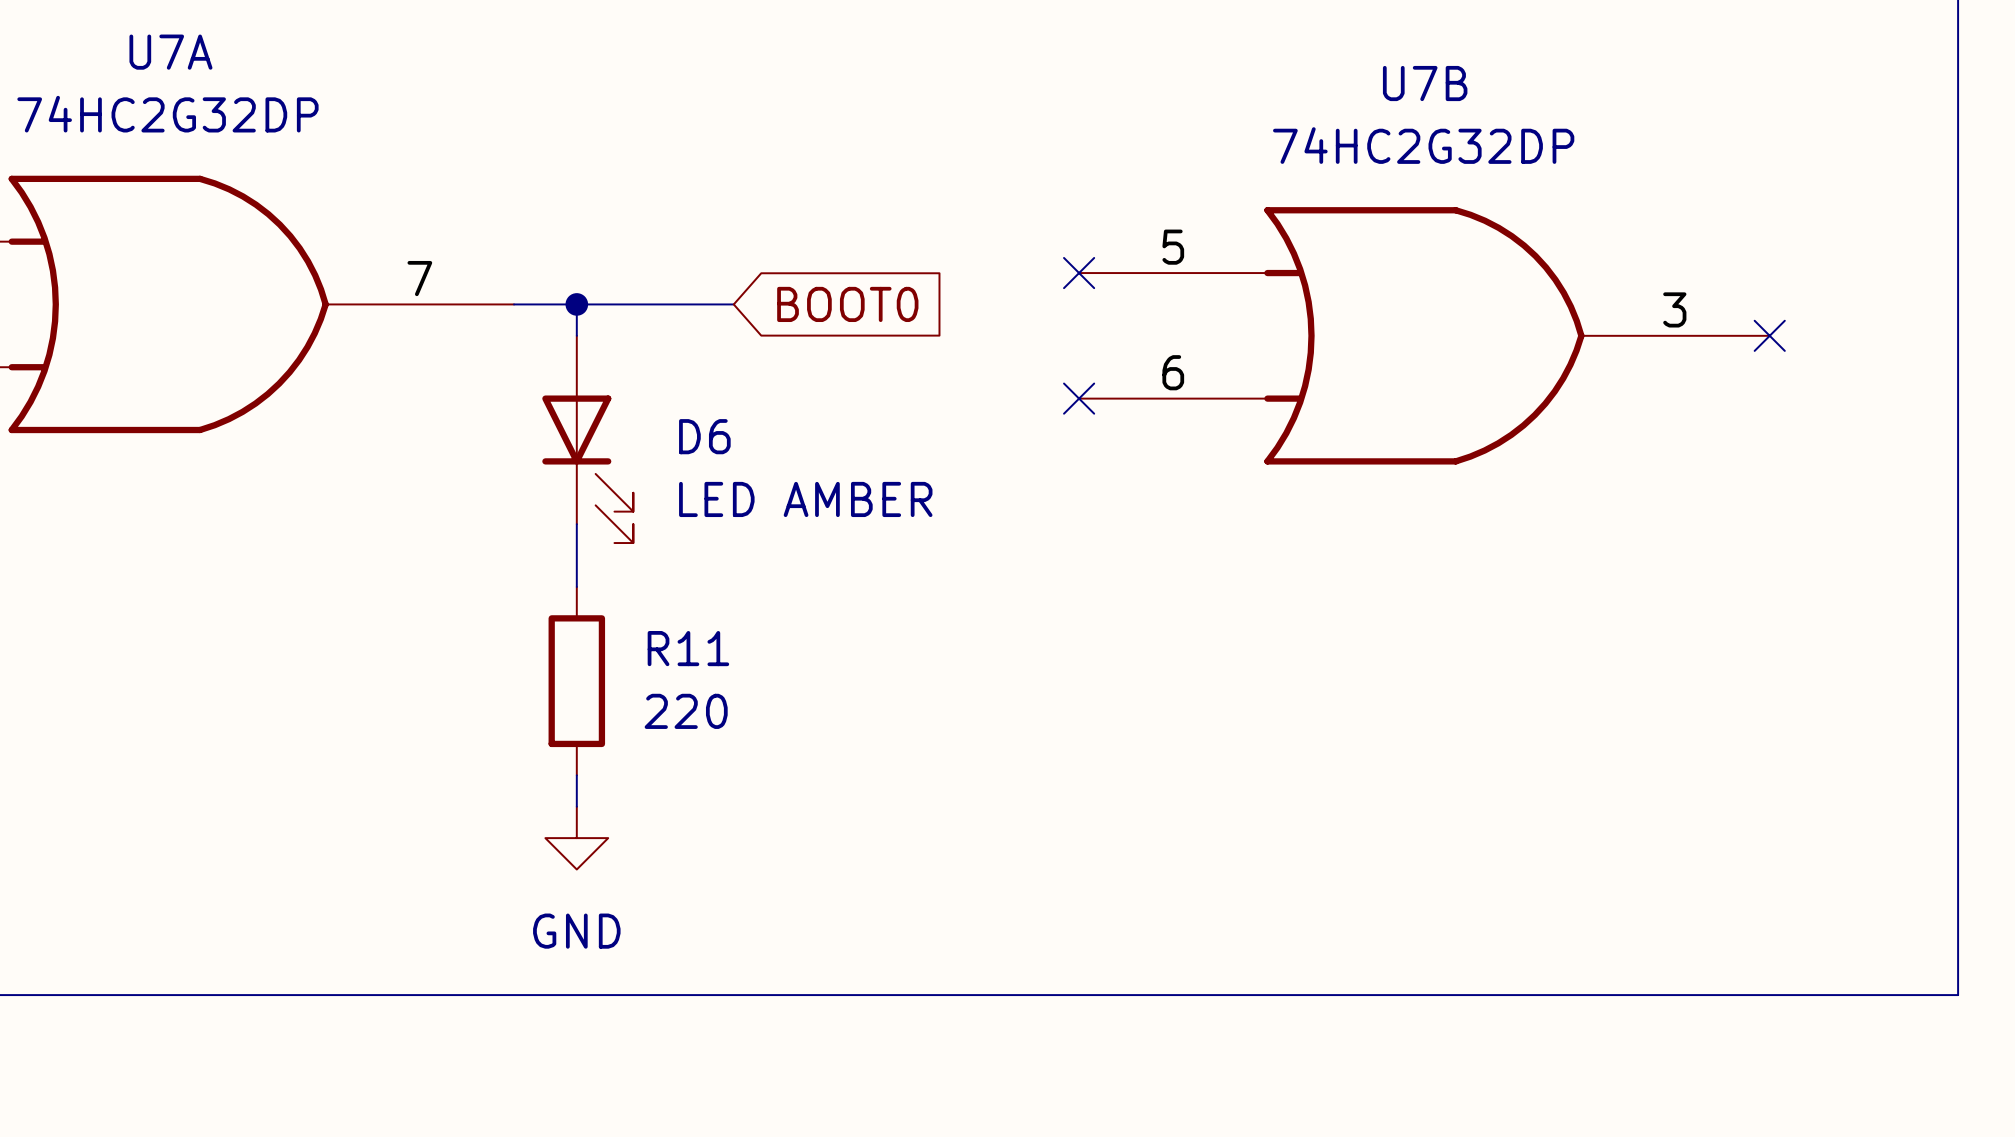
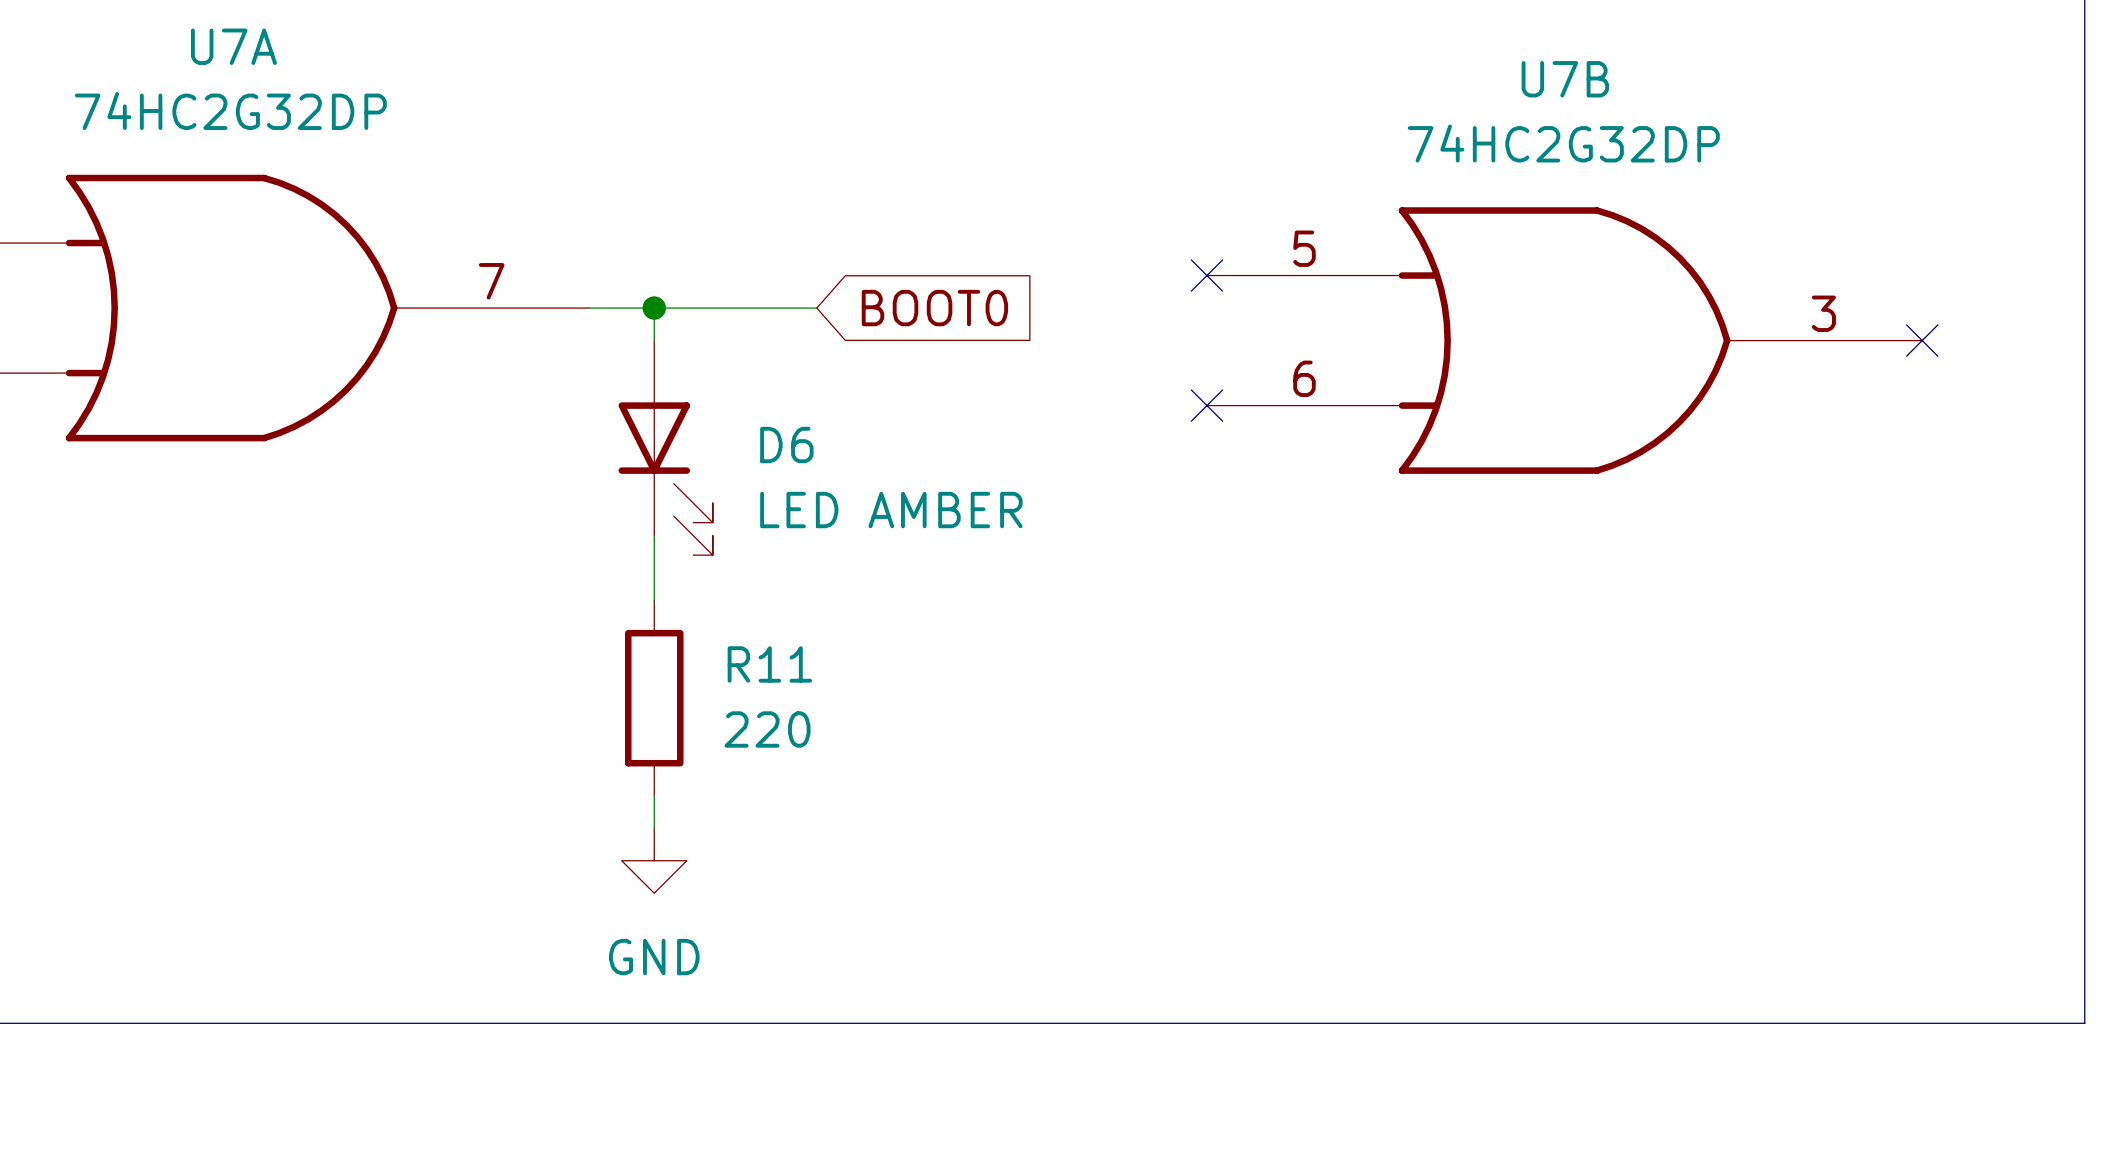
no-connect mark position: (1079, 273) -> (1206, 275)
U7B position: (1424, 335) -> (1564, 340)
no-connect mark position: (1769, 335) -> (1922, 340)
no-connect mark position: (1079, 398) -> (1206, 405)

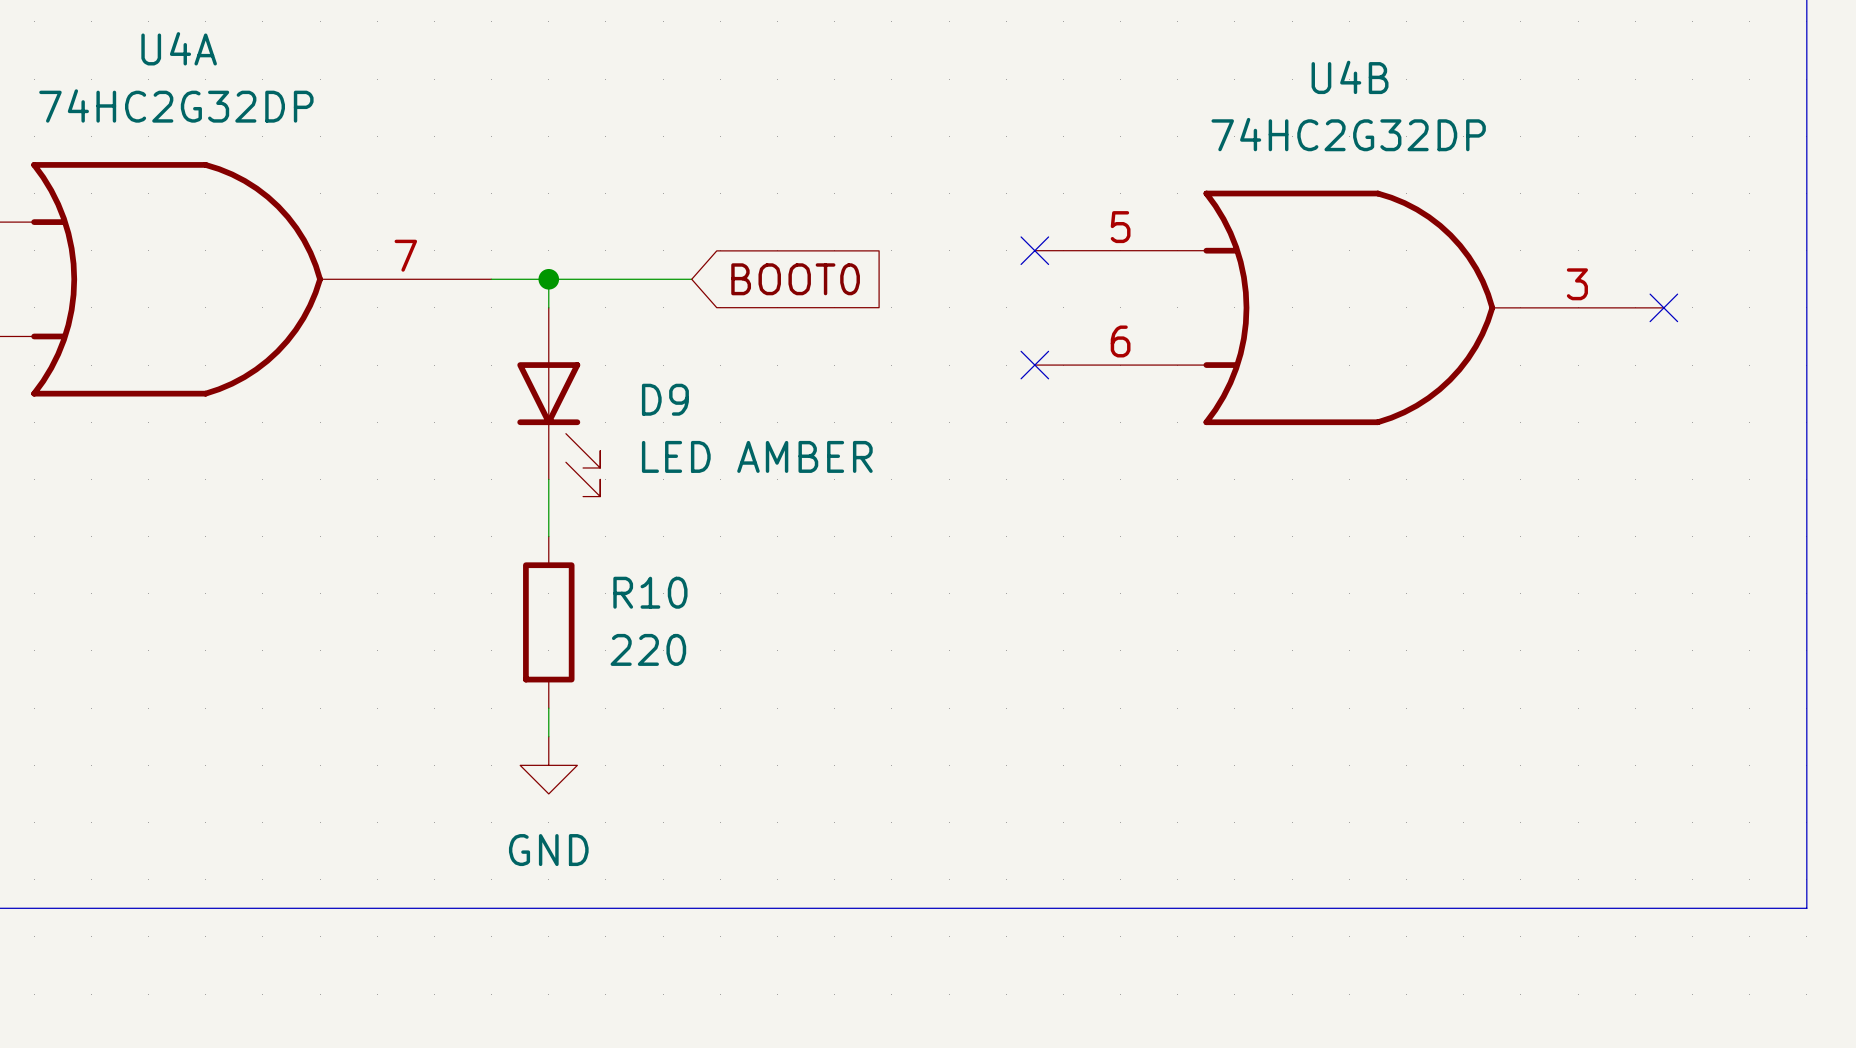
U7A name: U7A (233, 46) -> U4A (179, 48)
U7B name: U7B (1565, 79) -> U4B (1350, 77)
D6 name: D6 (786, 445) -> D9 (665, 399)
R11 name: R11 (769, 664) -> R10 (650, 592)

